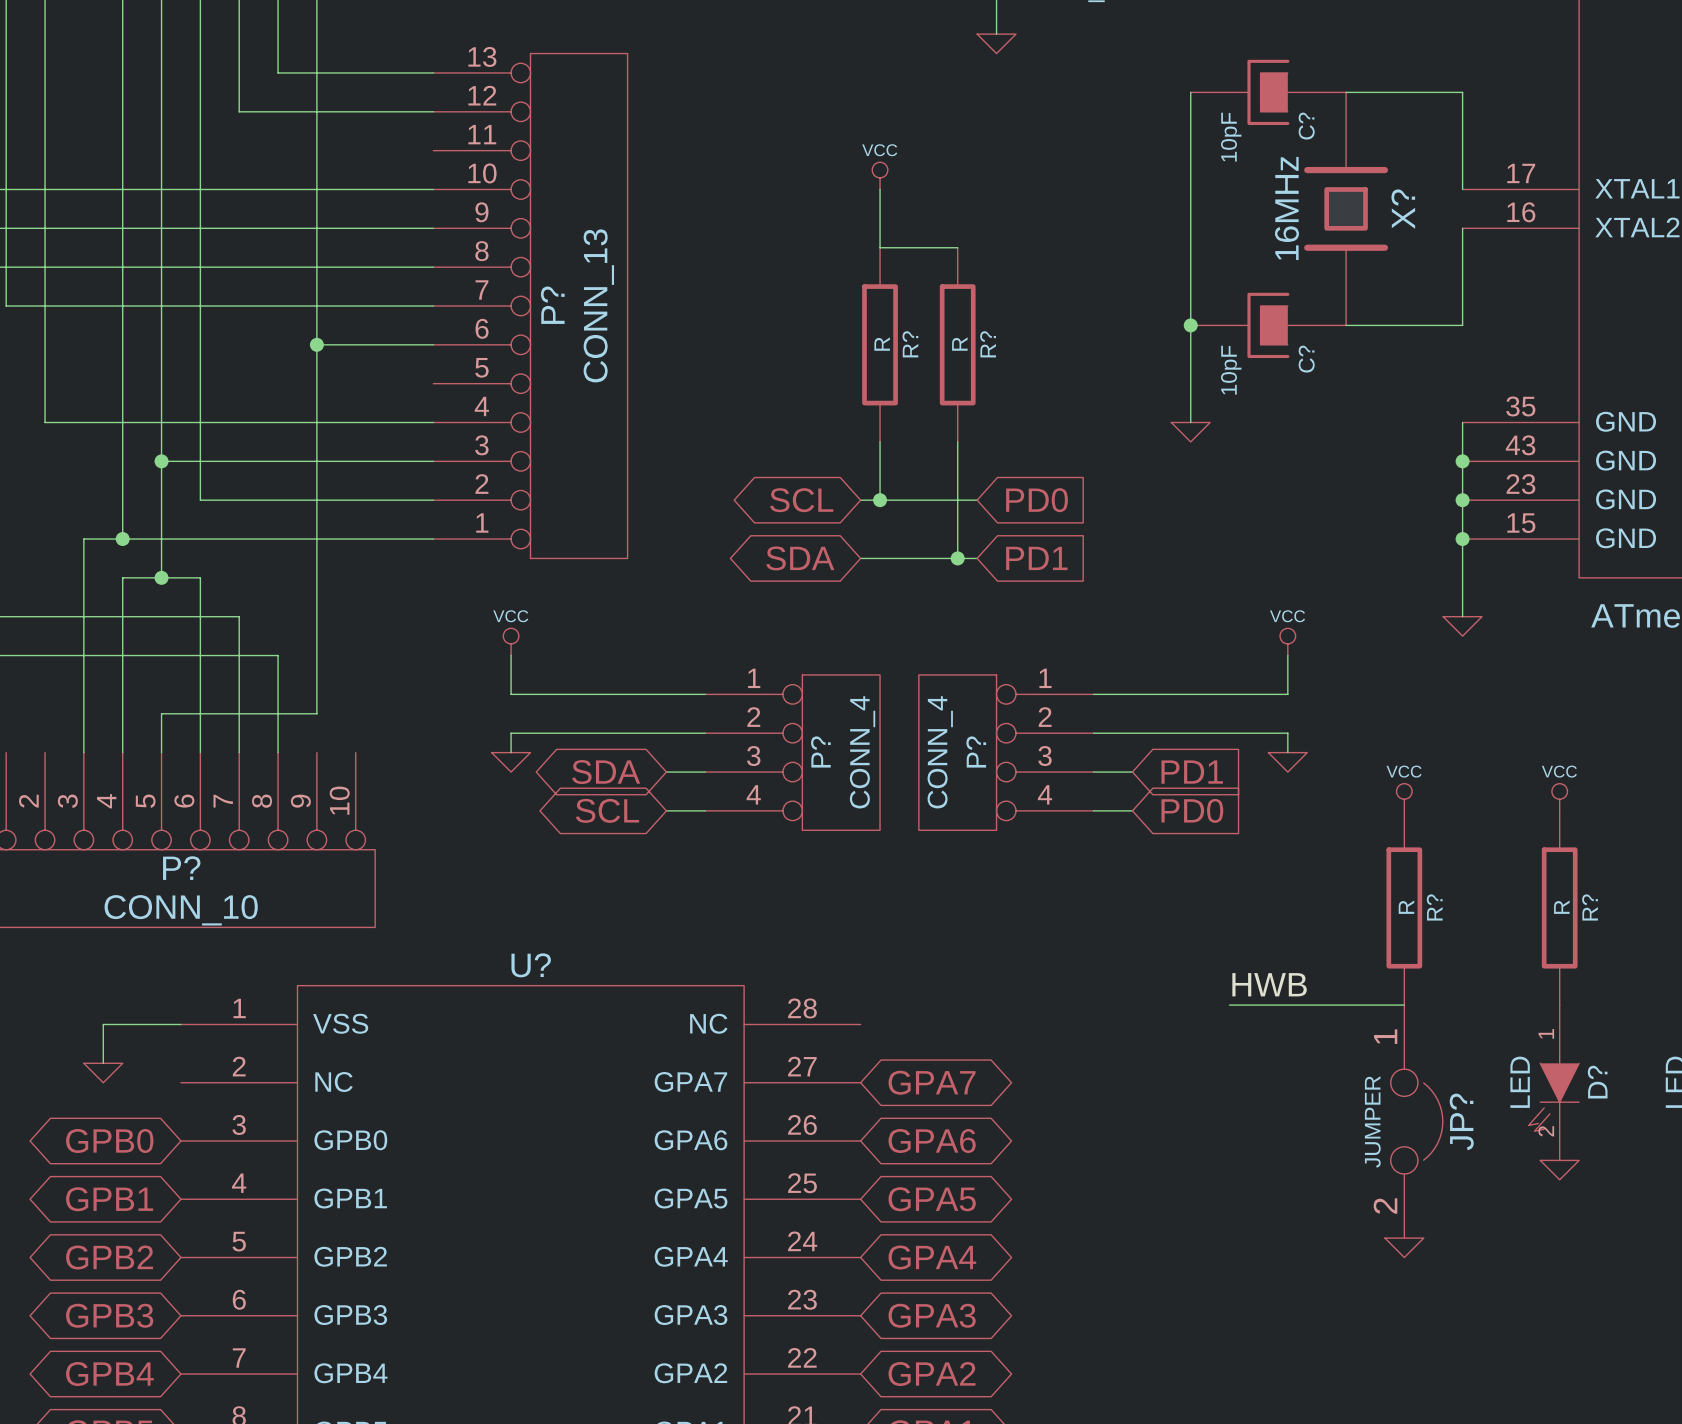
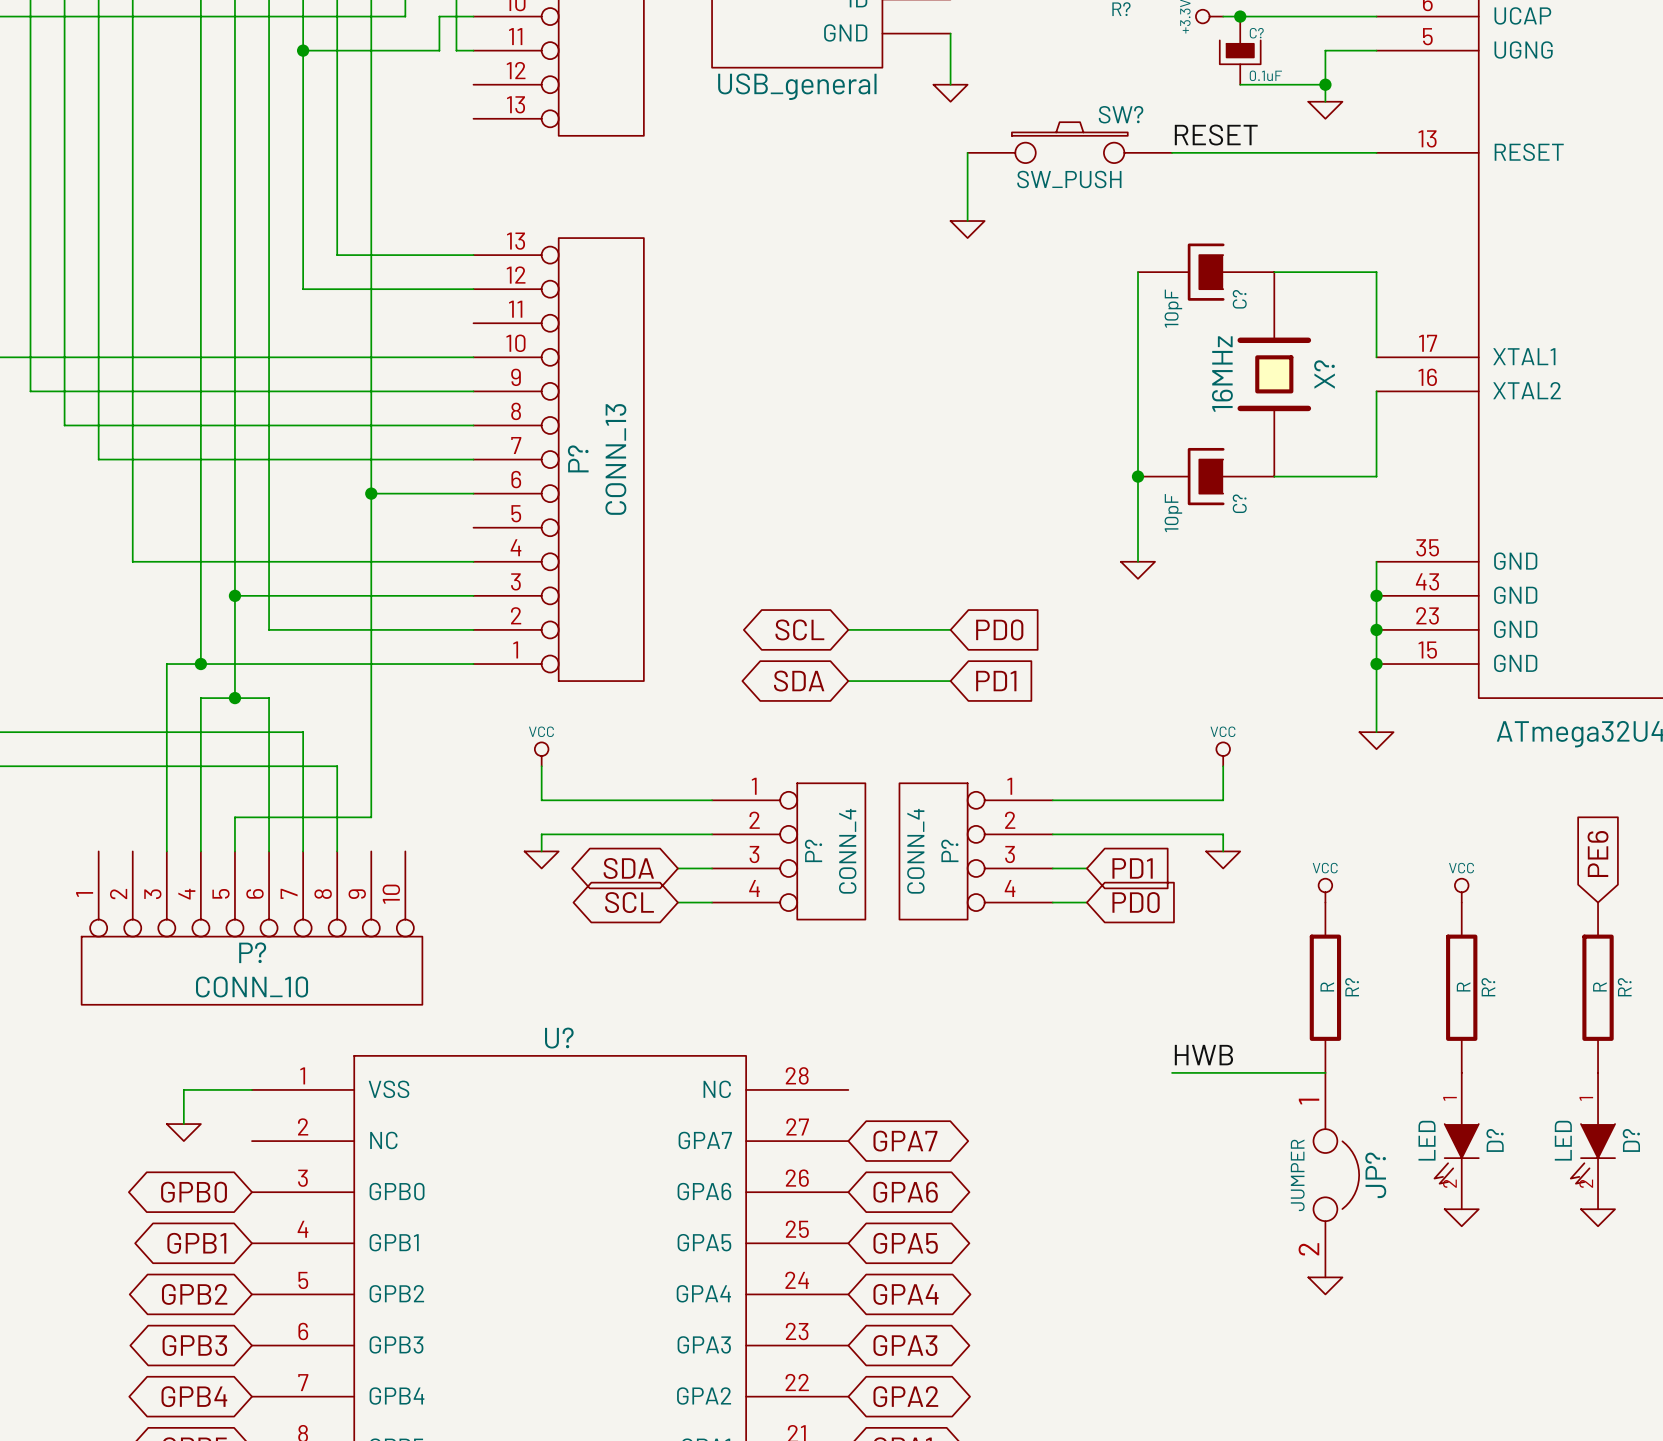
power symbol: VCC (880, 175) -> none
wire: (880, 189) (880, 247) (957, 247) -> none
R?: R (880, 344) -> none
R?: R (957, 344) -> none
wire: (880, 441) (880, 500) -> none
wire: (957, 441) (957, 558) -> none
junction: (880, 500) -> none
junction: (957, 558) -> none

